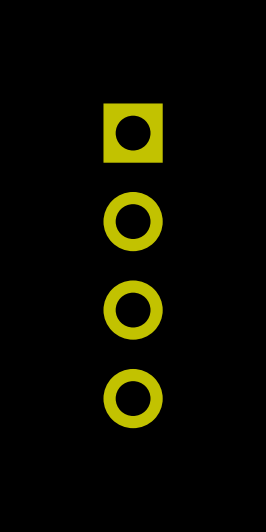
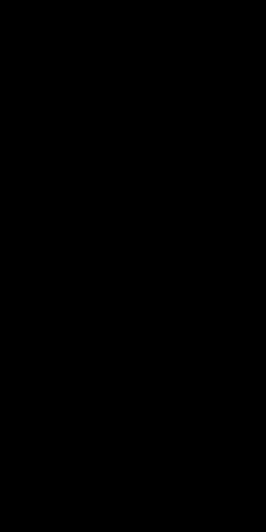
part: (133, 265) -> none

